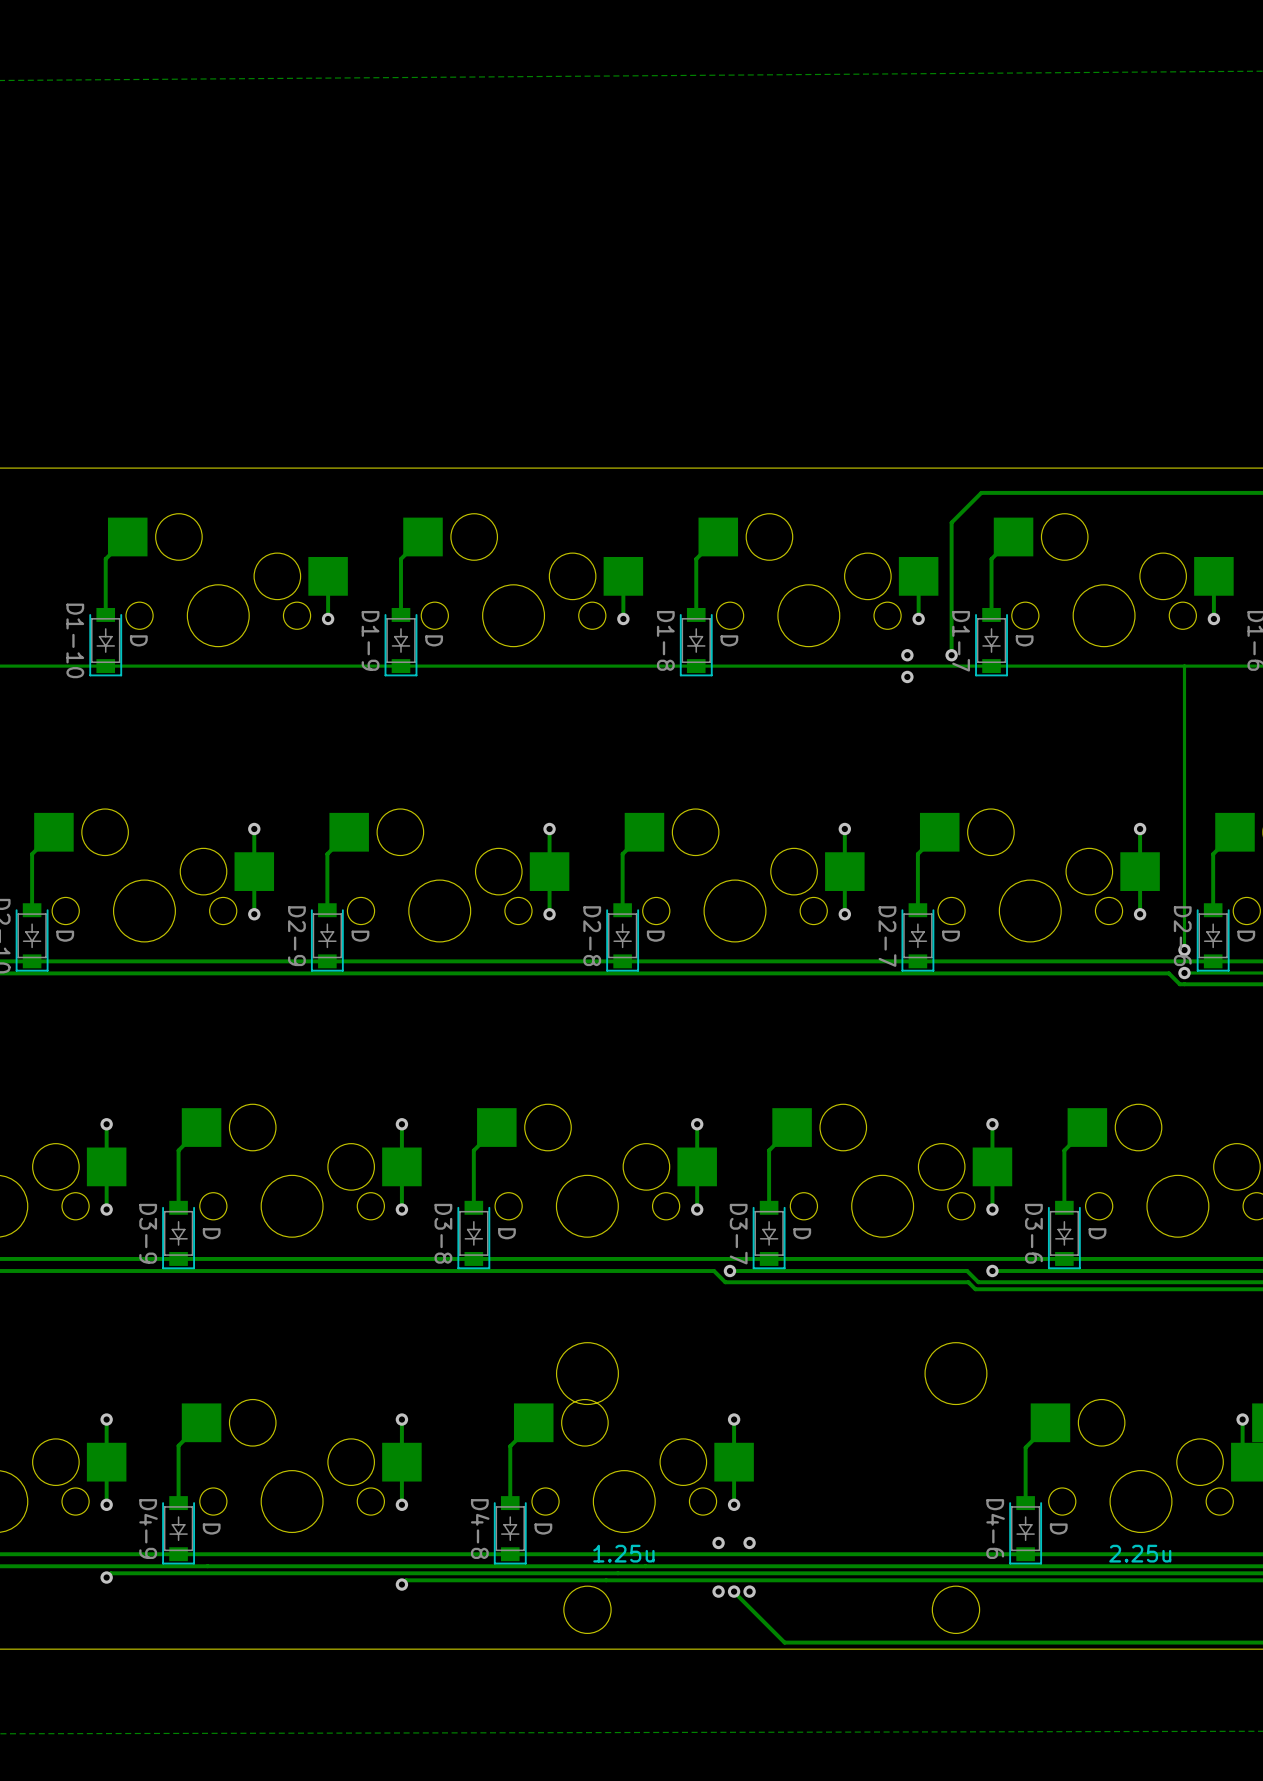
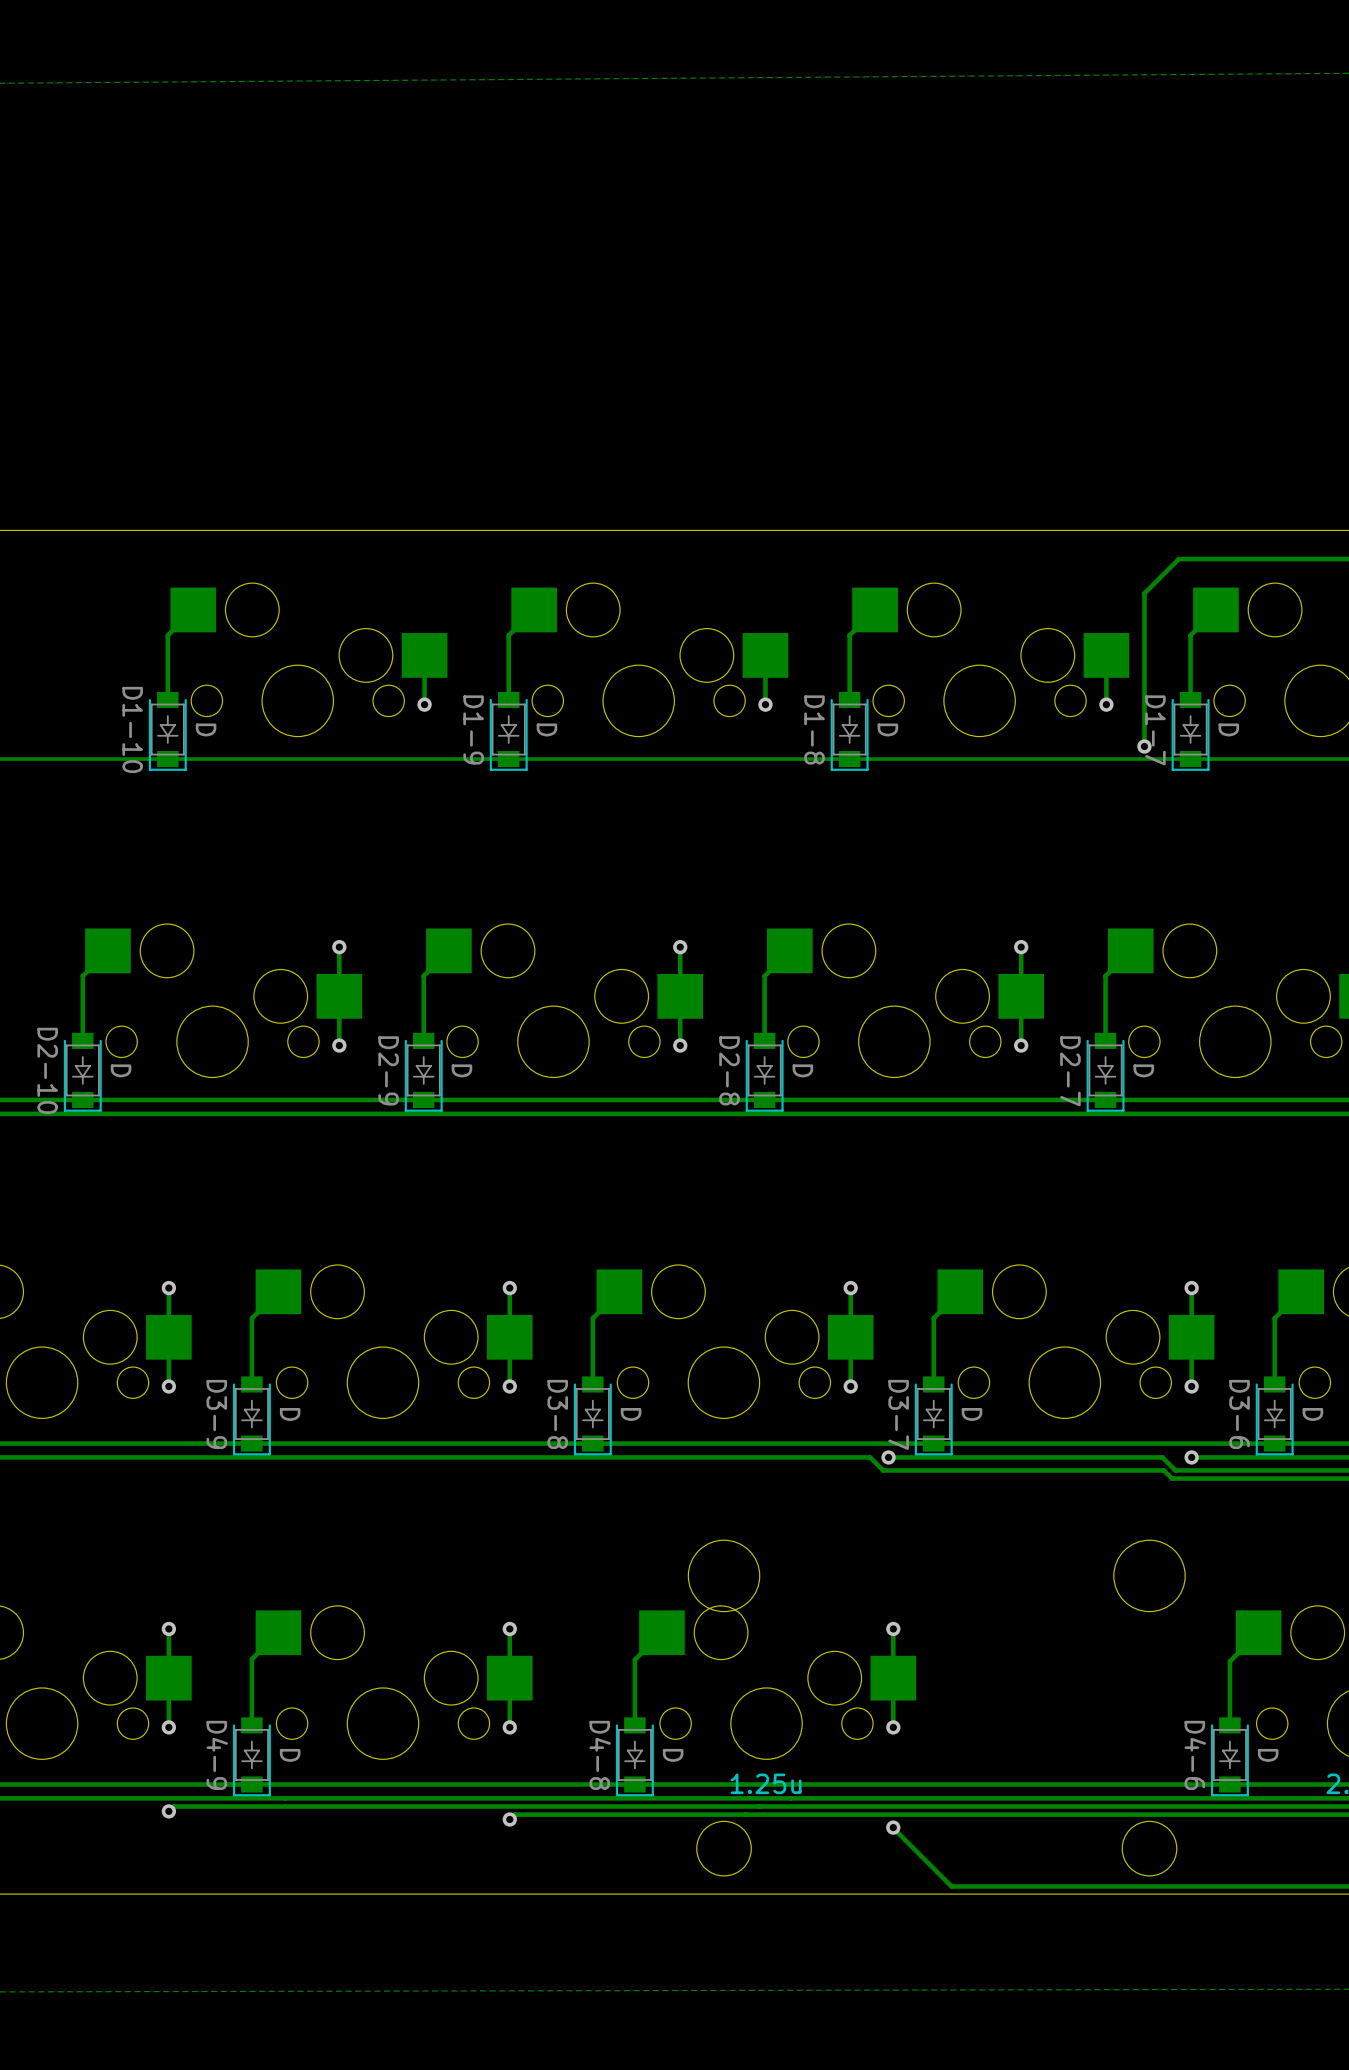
via: (907, 655) -> none
via: (907, 676) -> none
via: (718, 1542) -> none
via: (749, 1542) -> none
via: (718, 1591) -> none
via: (749, 1591) -> none

